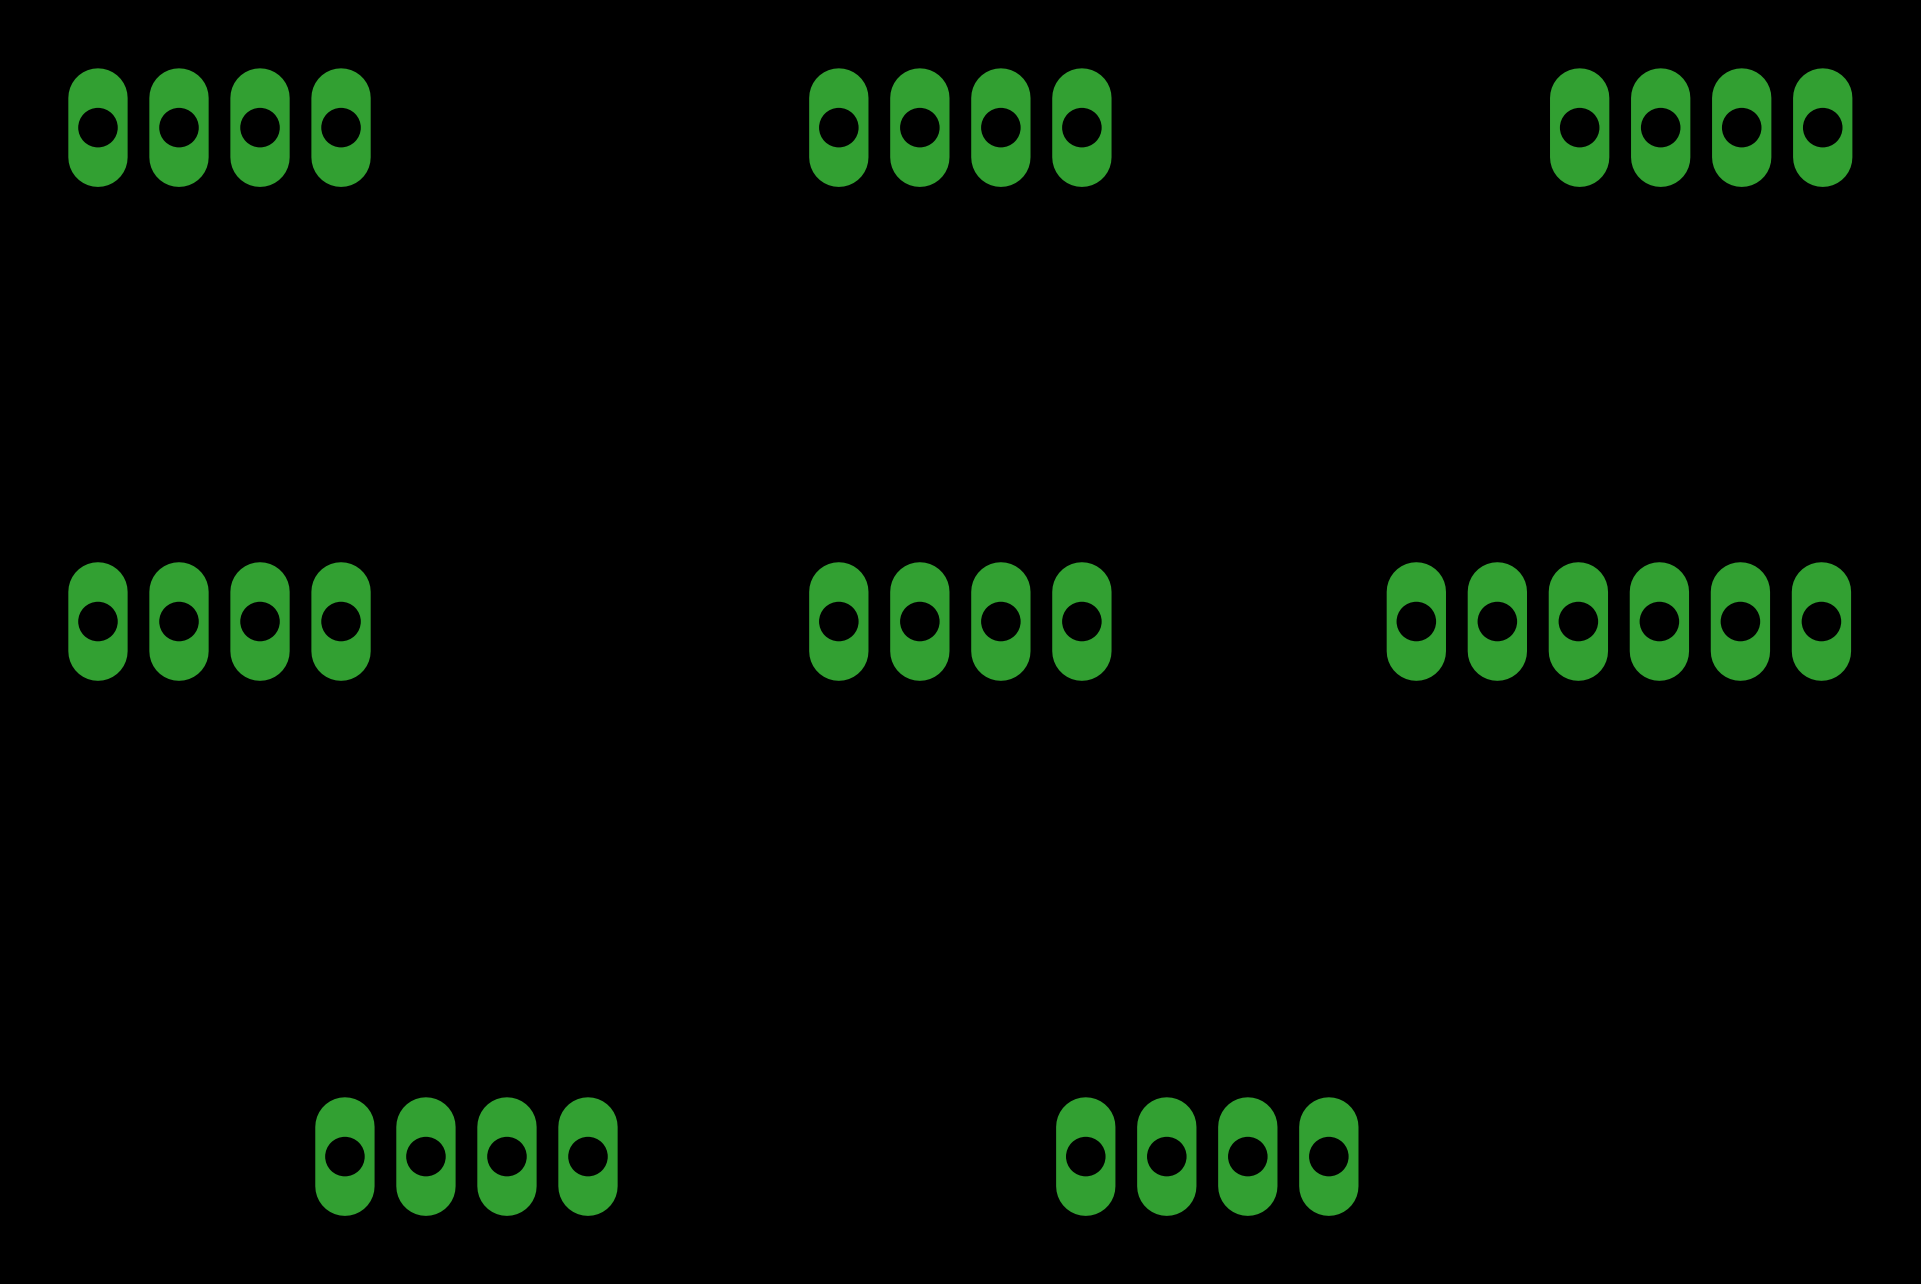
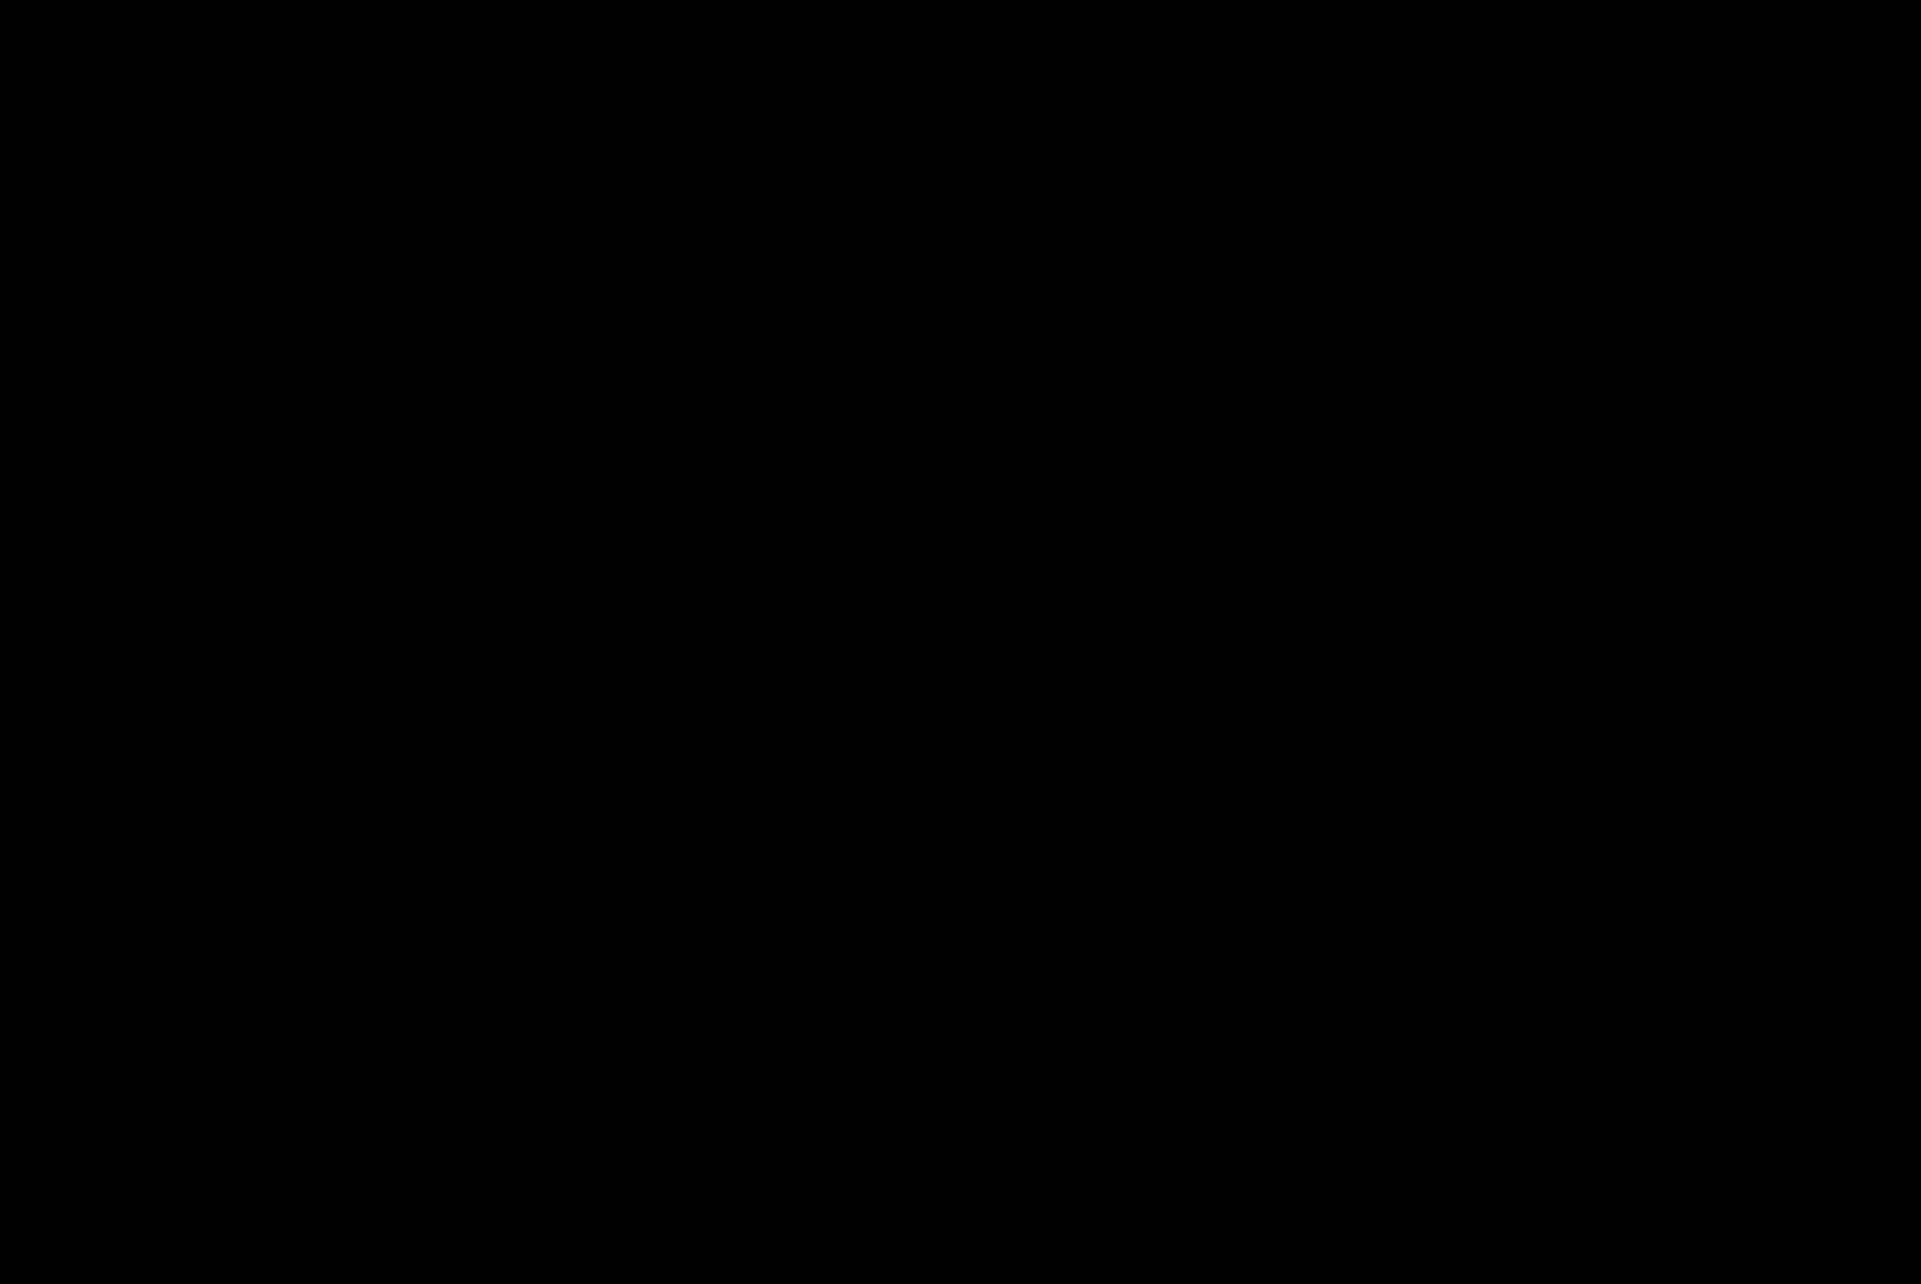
part: (219, 127) -> none
part: (960, 127) -> none
part: (1701, 127) -> none
part: (219, 621) -> none
part: (960, 621) -> none
part: (1618, 621) -> none
part: (466, 1156) -> none
part: (1207, 1156) -> none

